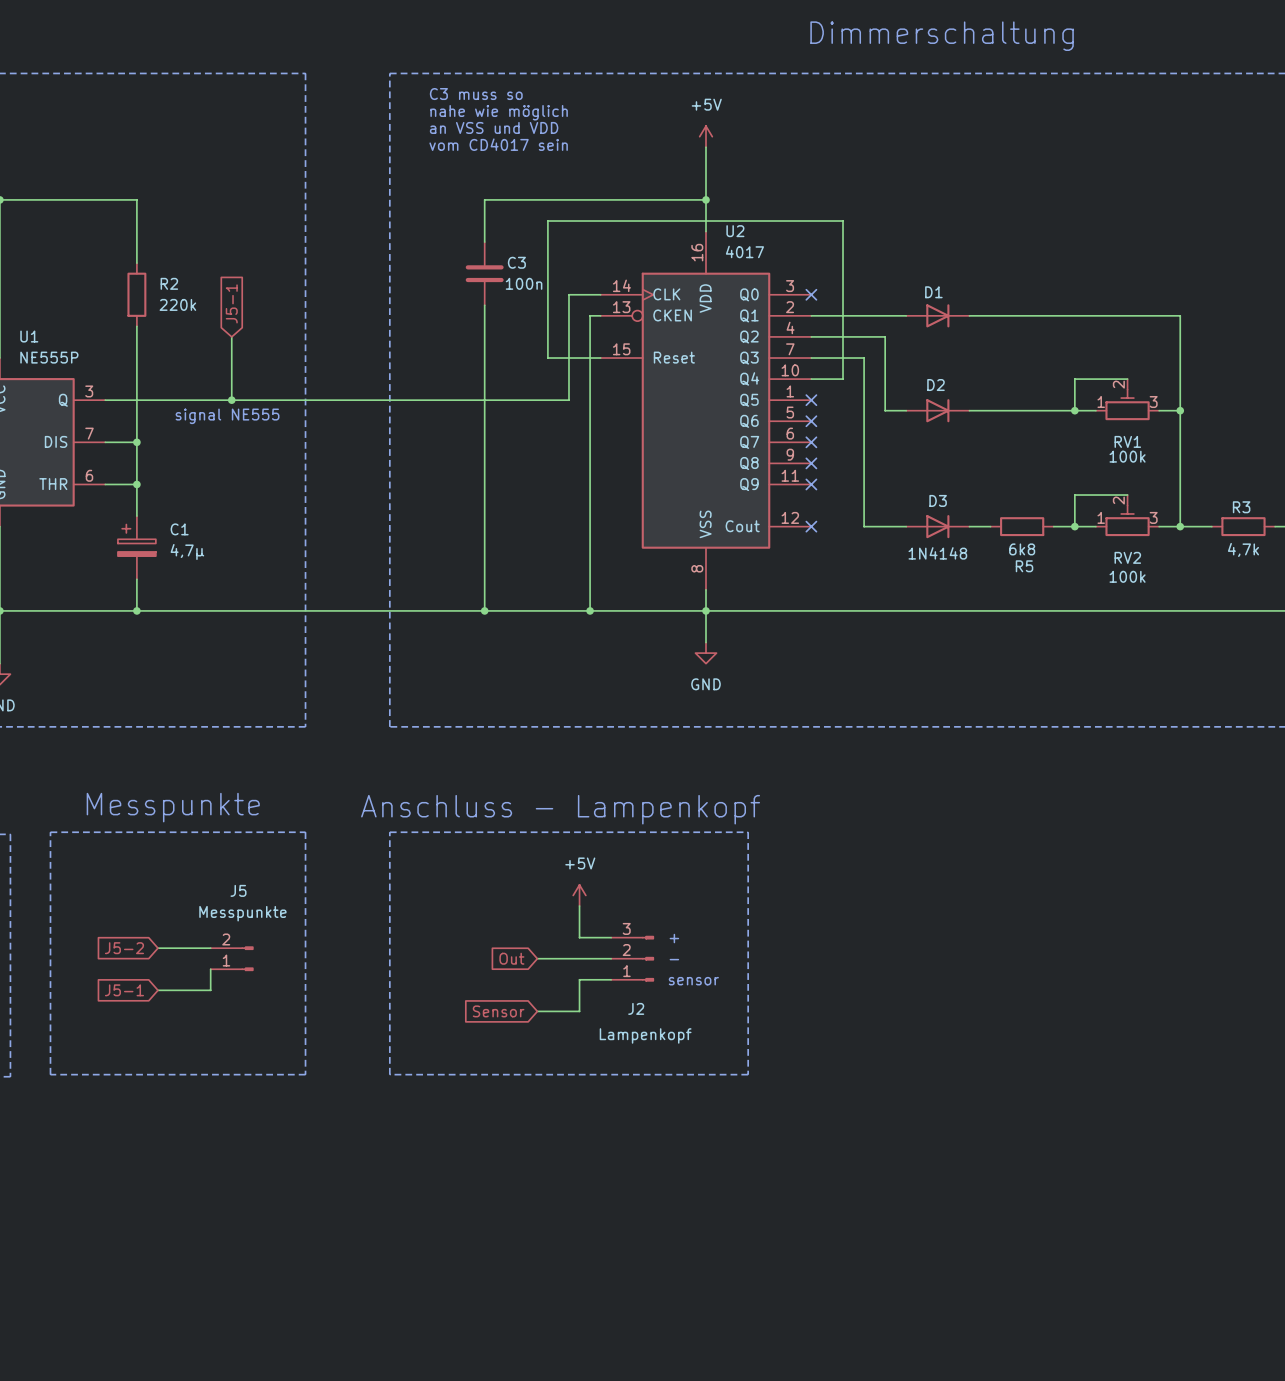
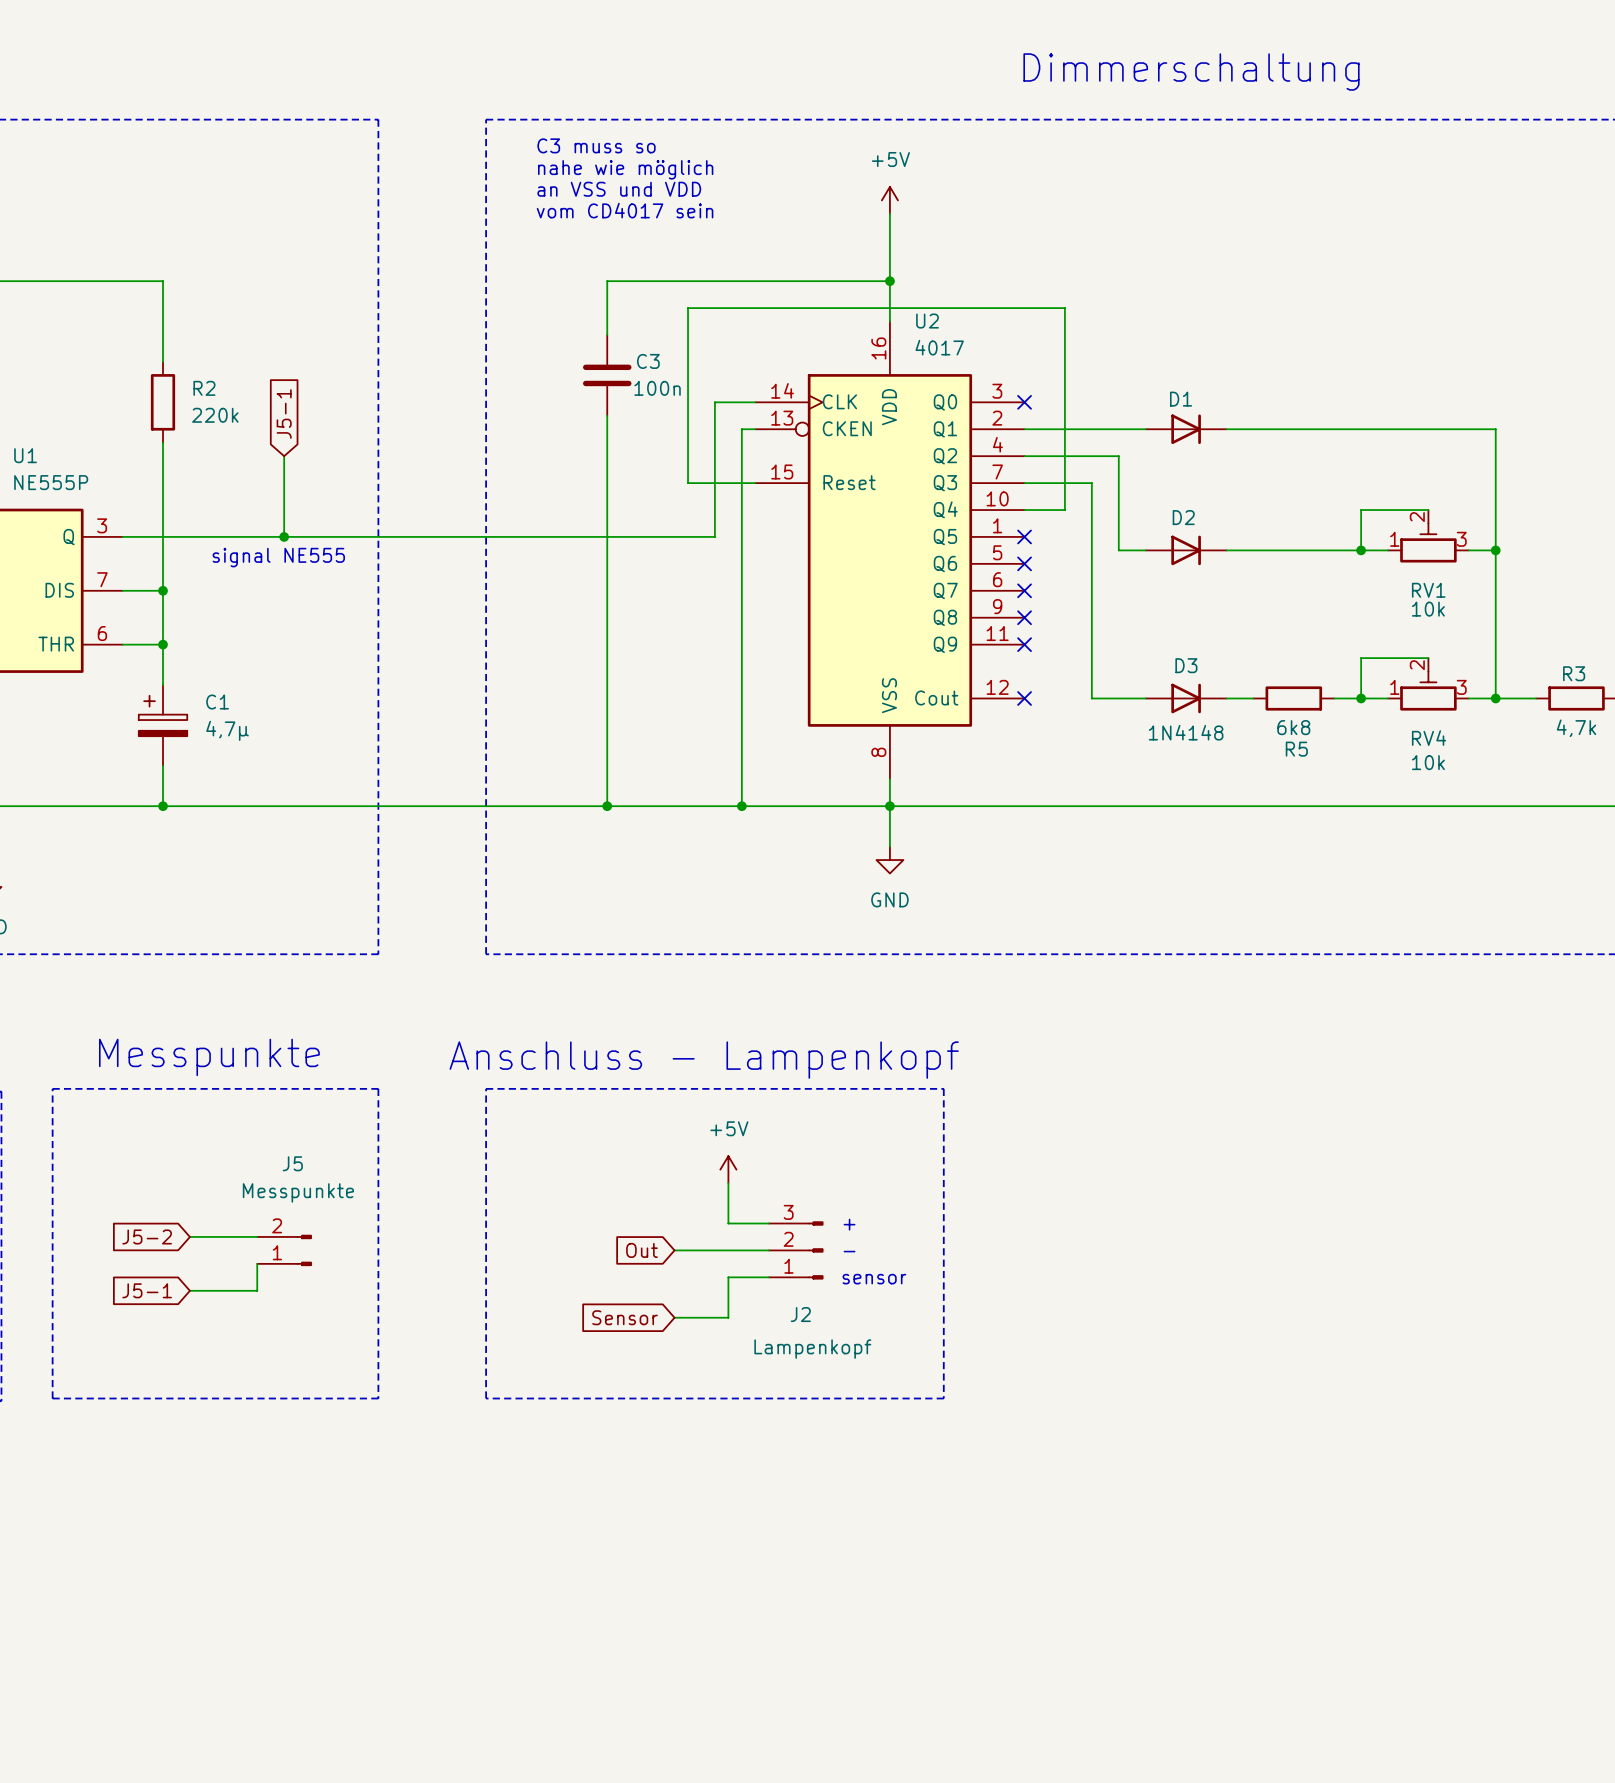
RV1 value: 100k (1127, 456) -> 10k (1428, 609)
RV2 name: RV2 (1127, 557) -> RV4 (1429, 738)
RV2 value: 100k (1127, 576) -> 10k (1428, 762)

